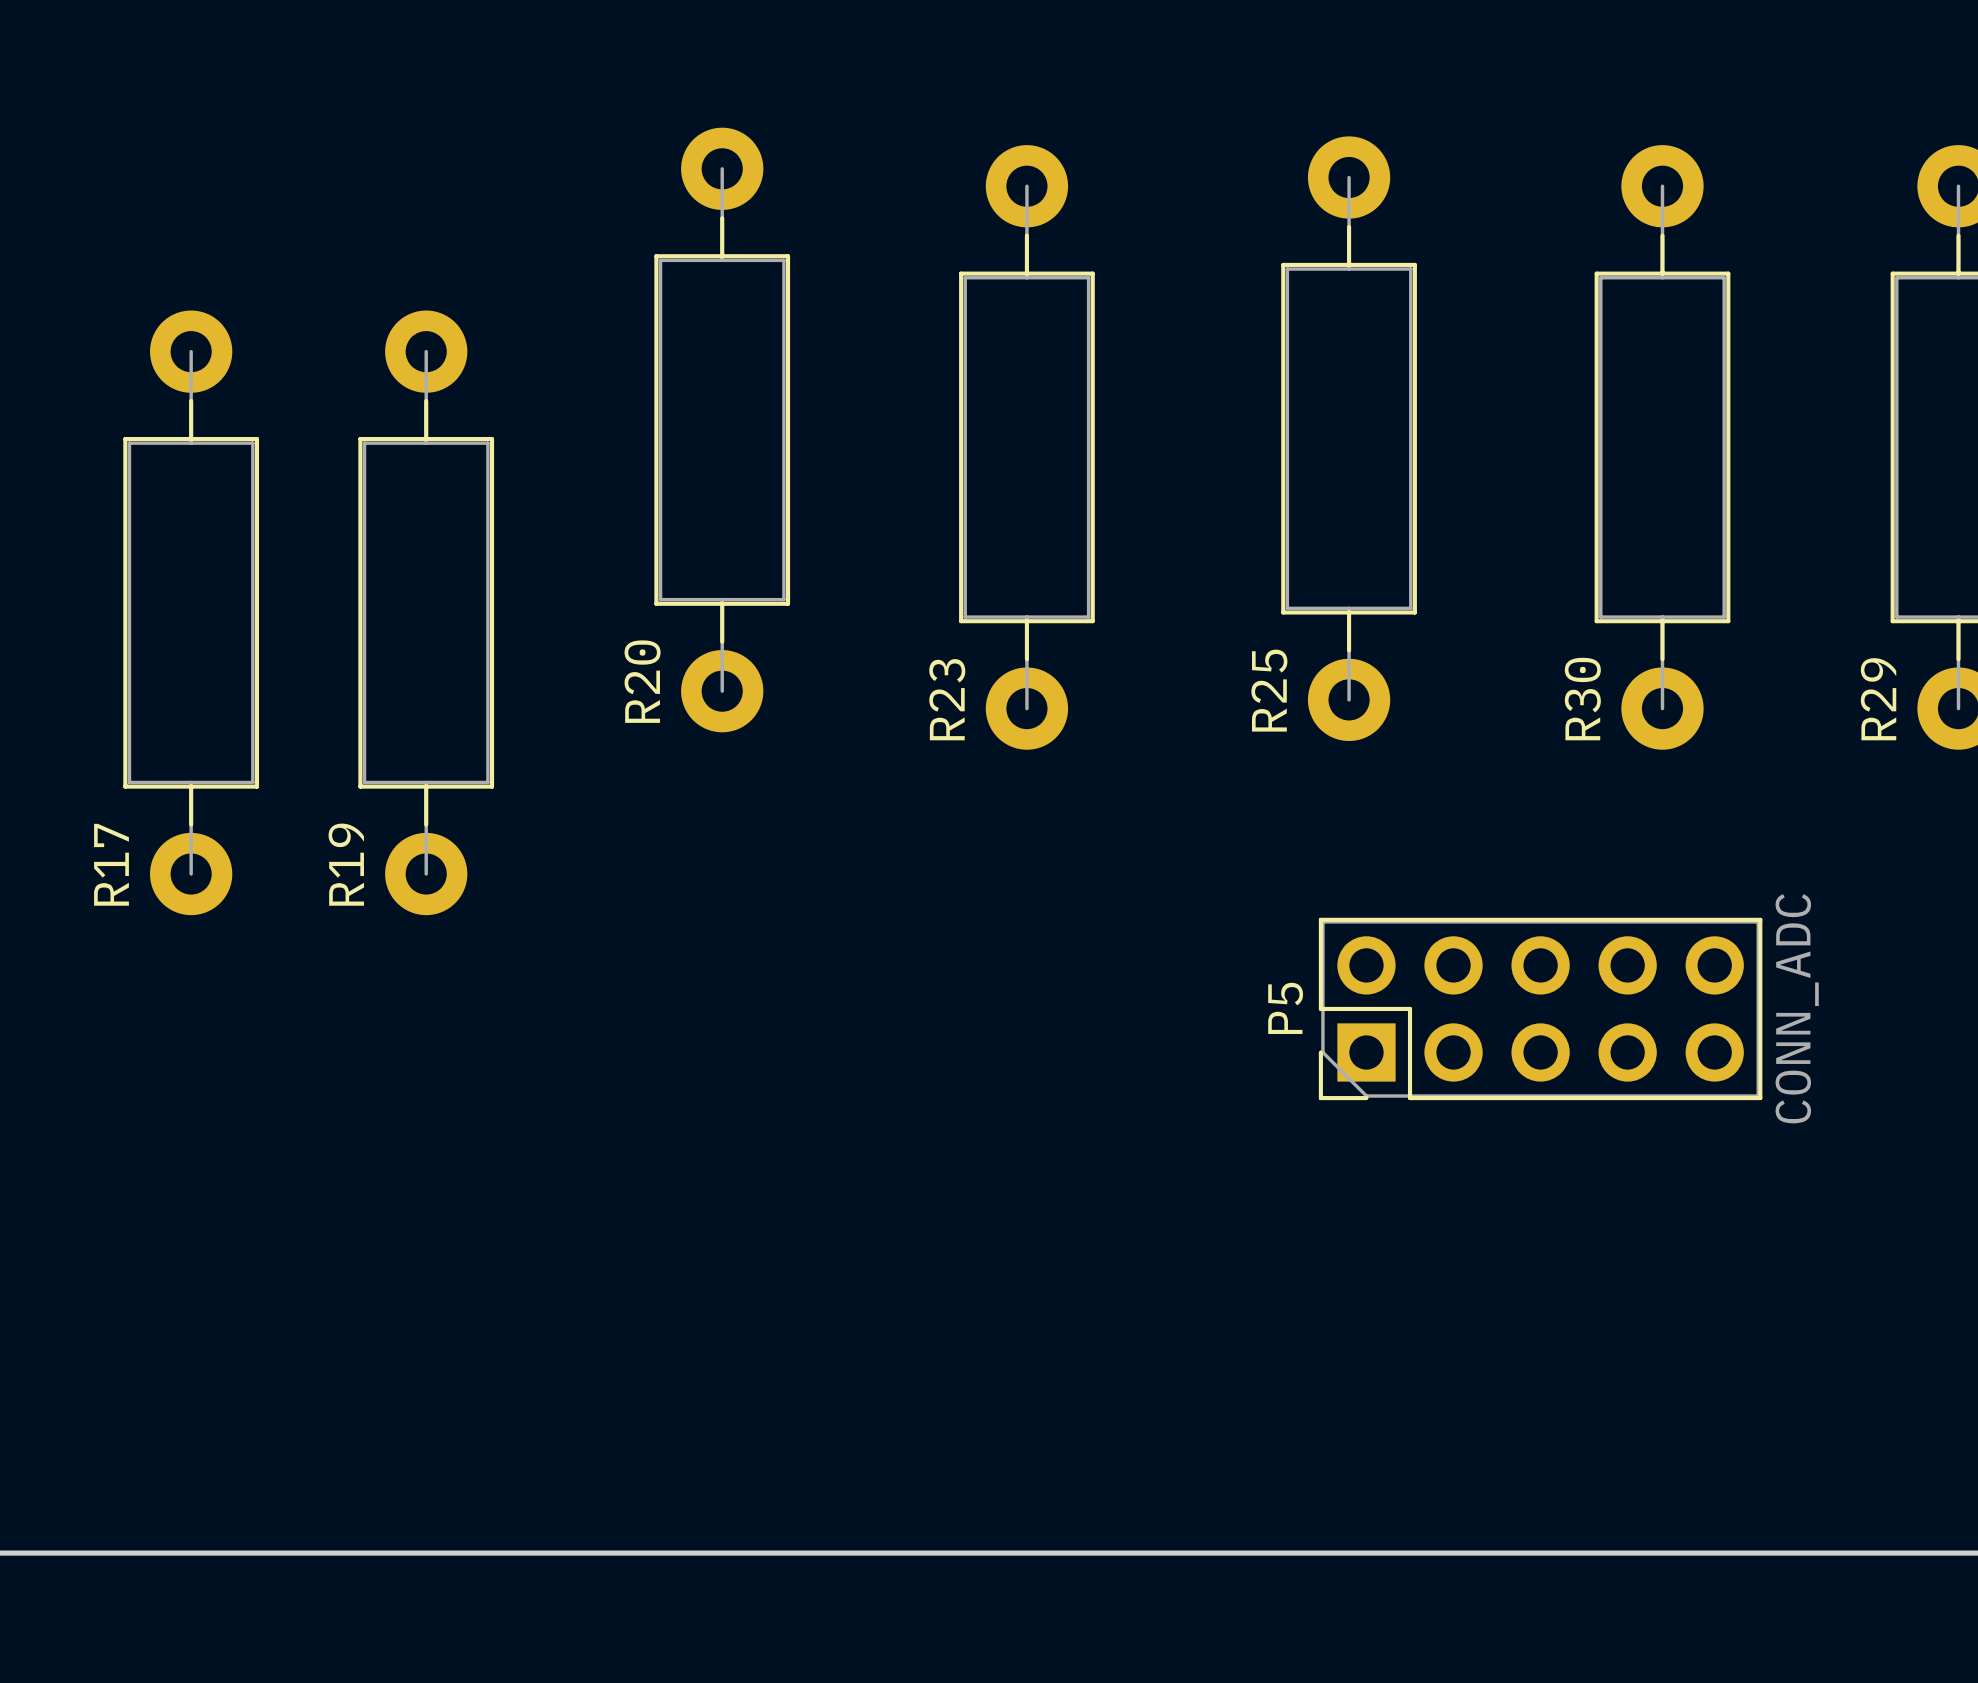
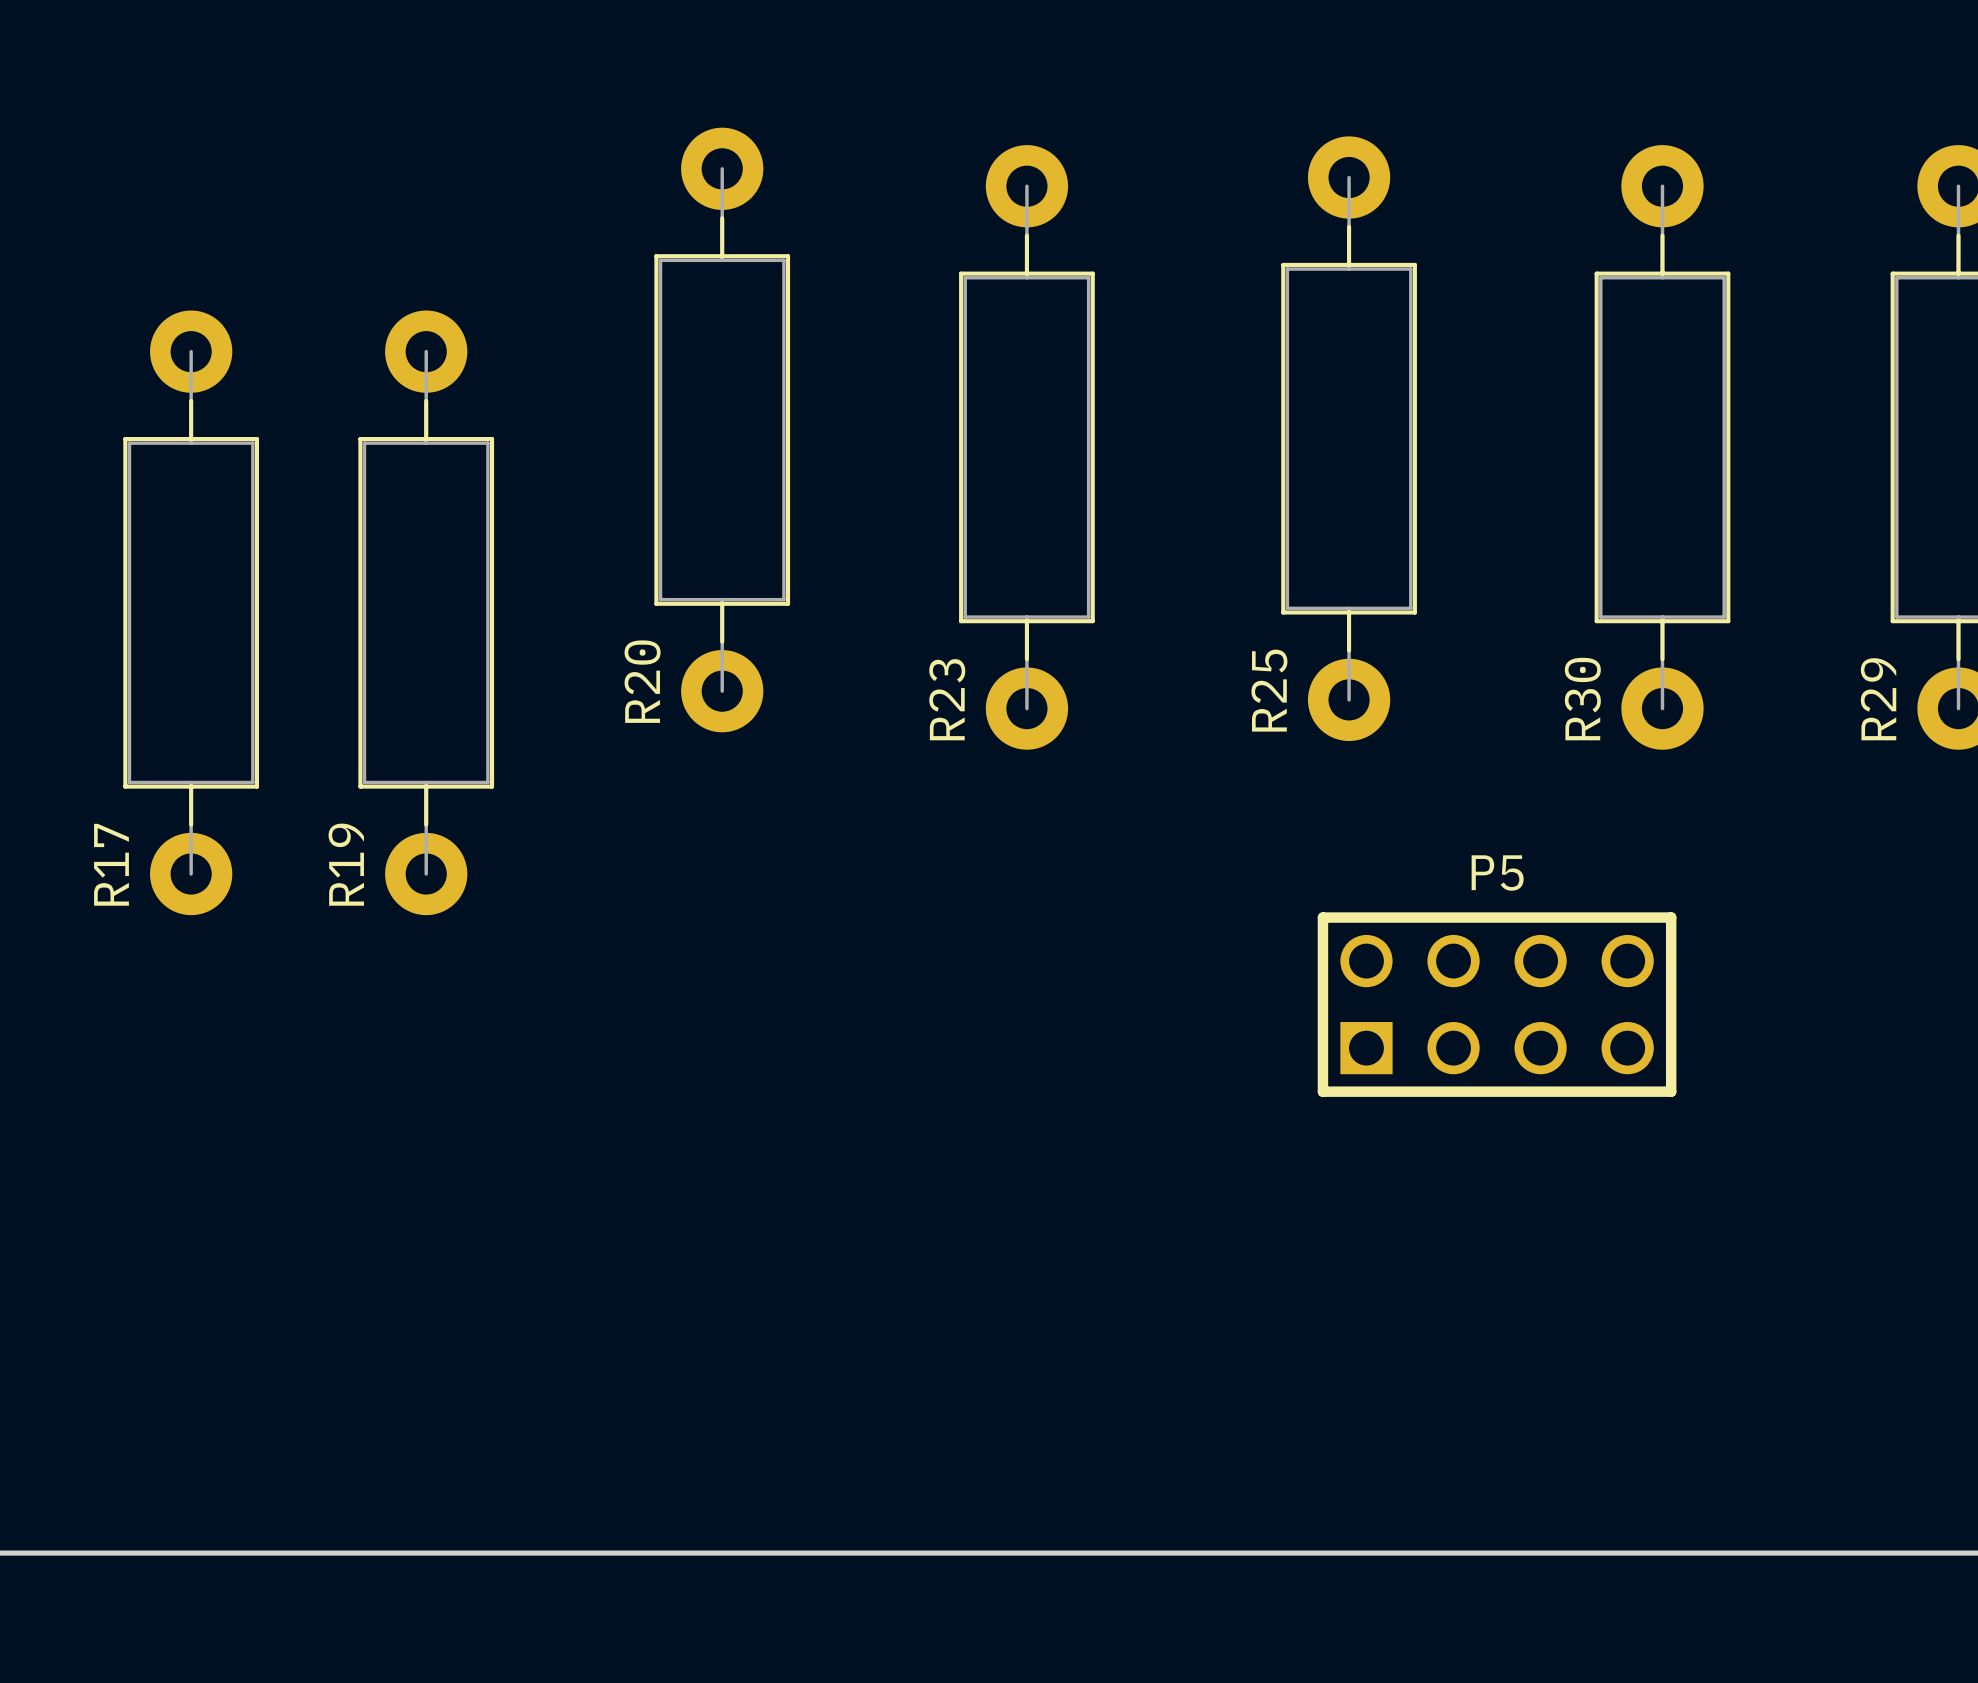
P5 footprint: [1318, 917, 1763, 1101] -> [1317, 912, 1677, 1097]
P5 name position: P5 (1285, 1008) -> P5 (1497, 873)
P5 value: CONN_ADC (1797, 1008) -> none

